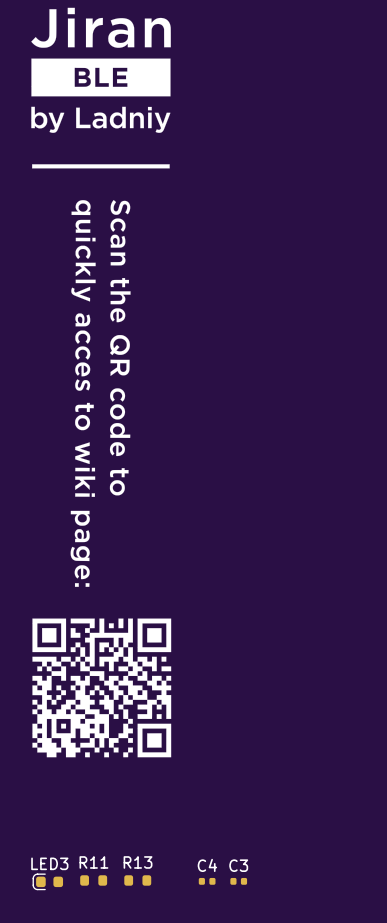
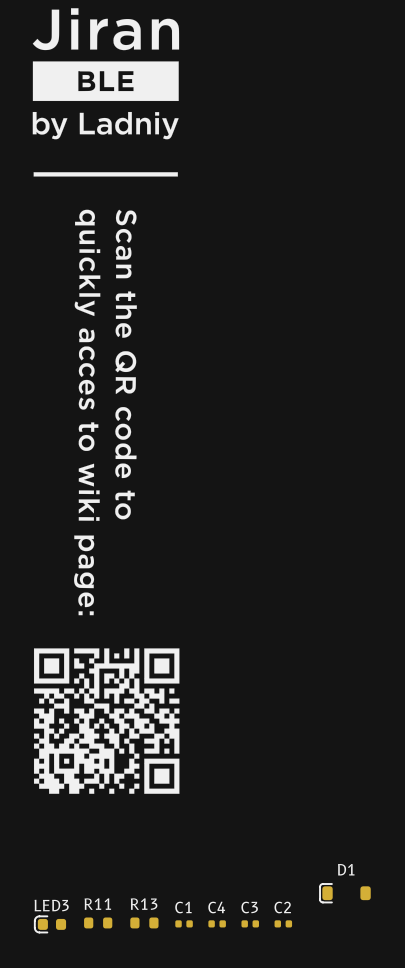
D1: none -> (345, 893)
C1: none -> (184, 923)
C2: none -> (283, 923)

